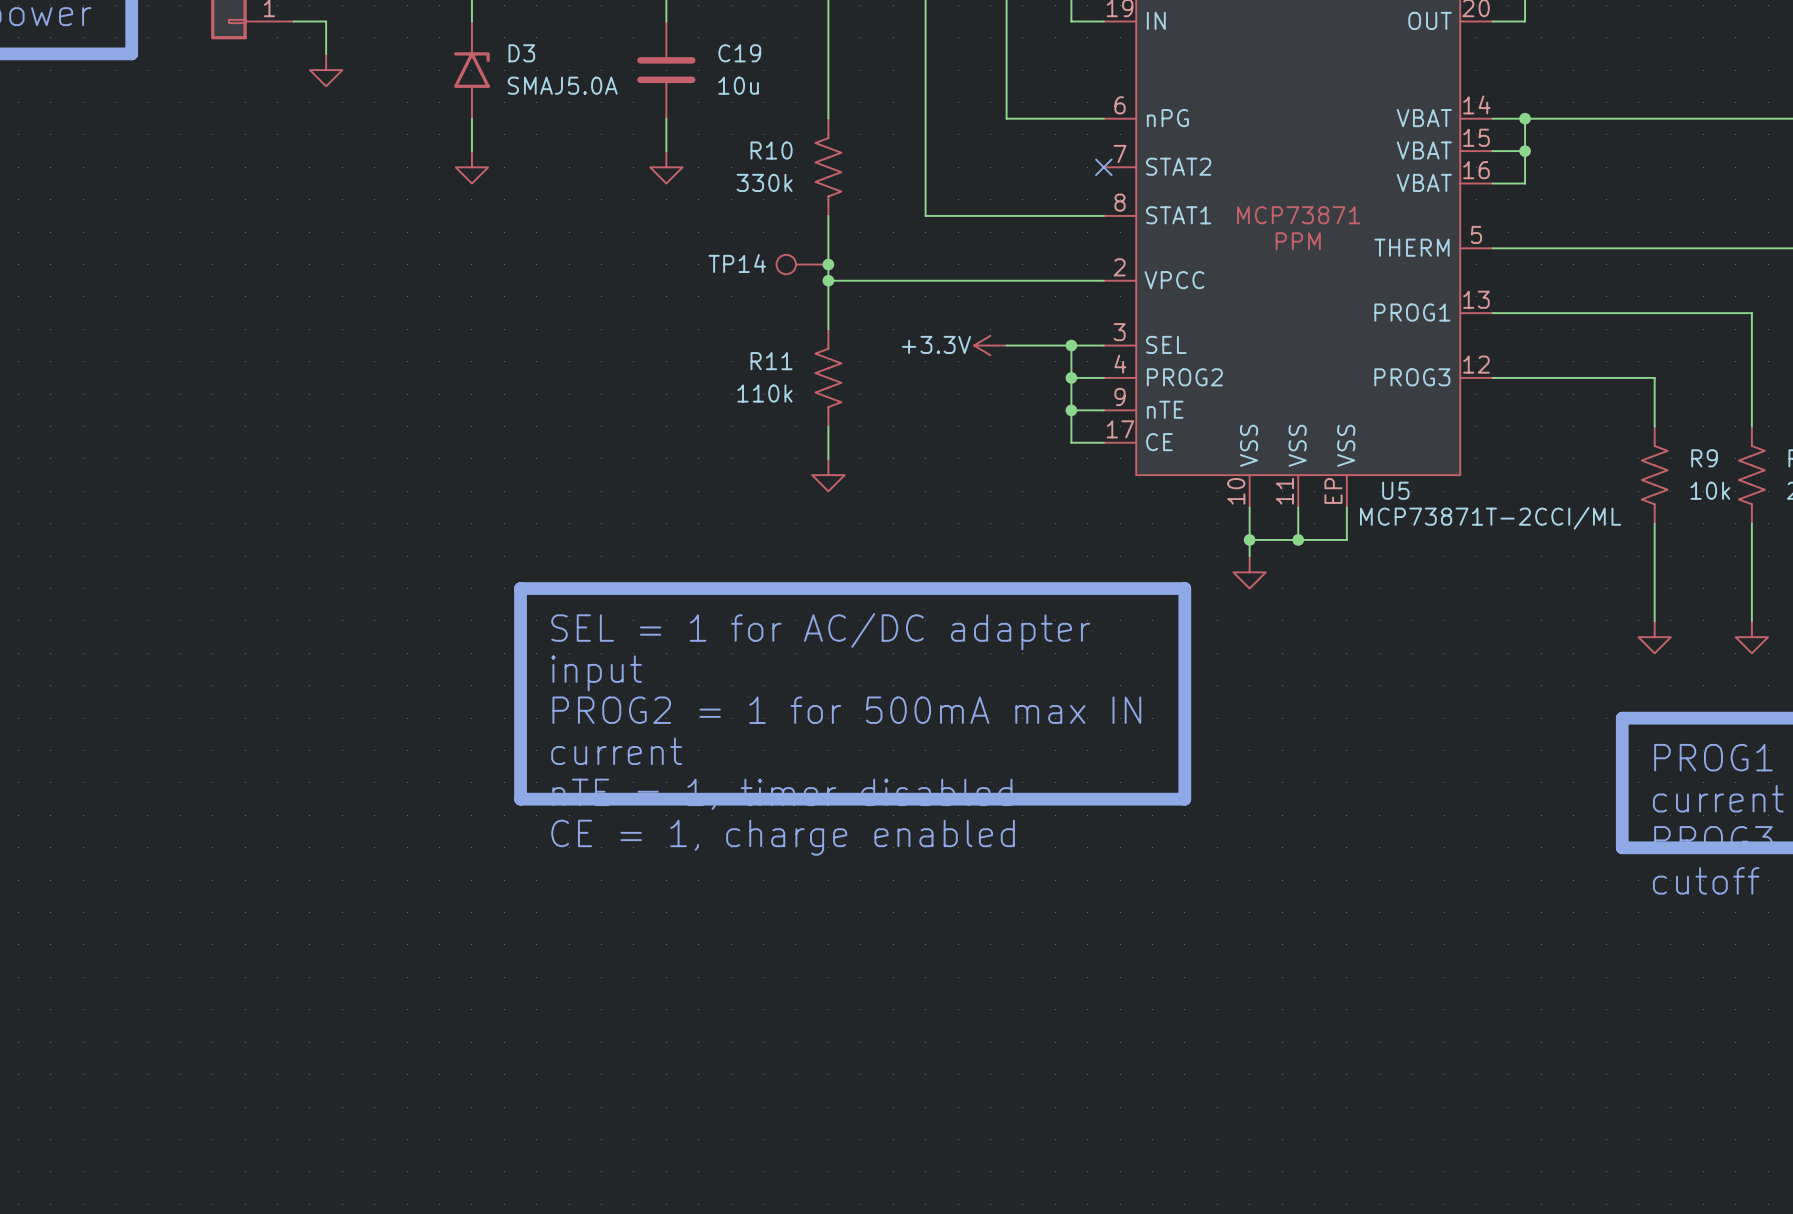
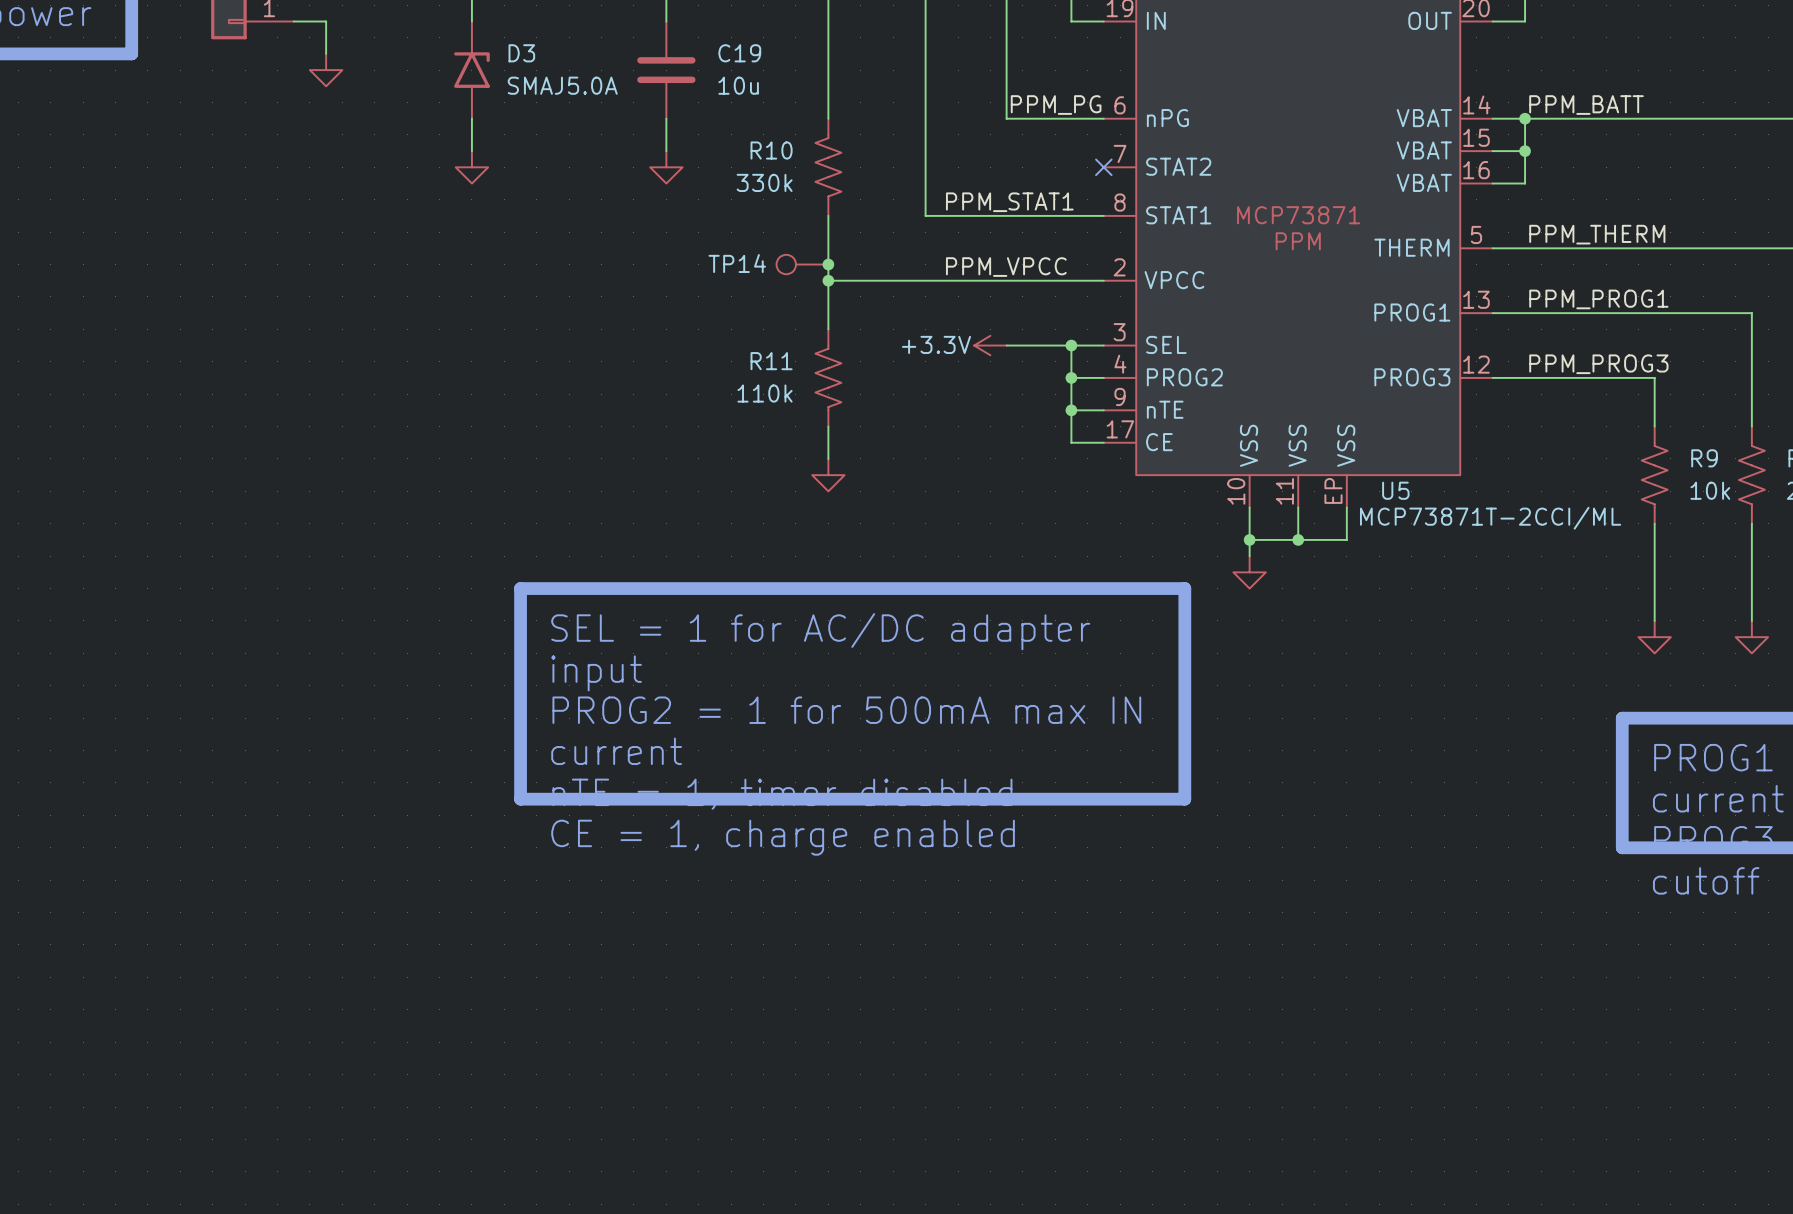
label: none -> PPM_PG (1056, 105)
label: none -> PPM_BATT (1586, 105)
label: none -> PPM_STAT1 (1009, 202)
label: none -> PPM_THERM (1597, 234)
label: none -> PPM_VPCC (1006, 267)
label: none -> PPM_PROG1 (1598, 299)
label: none -> PPM_PROG3 (1598, 364)

